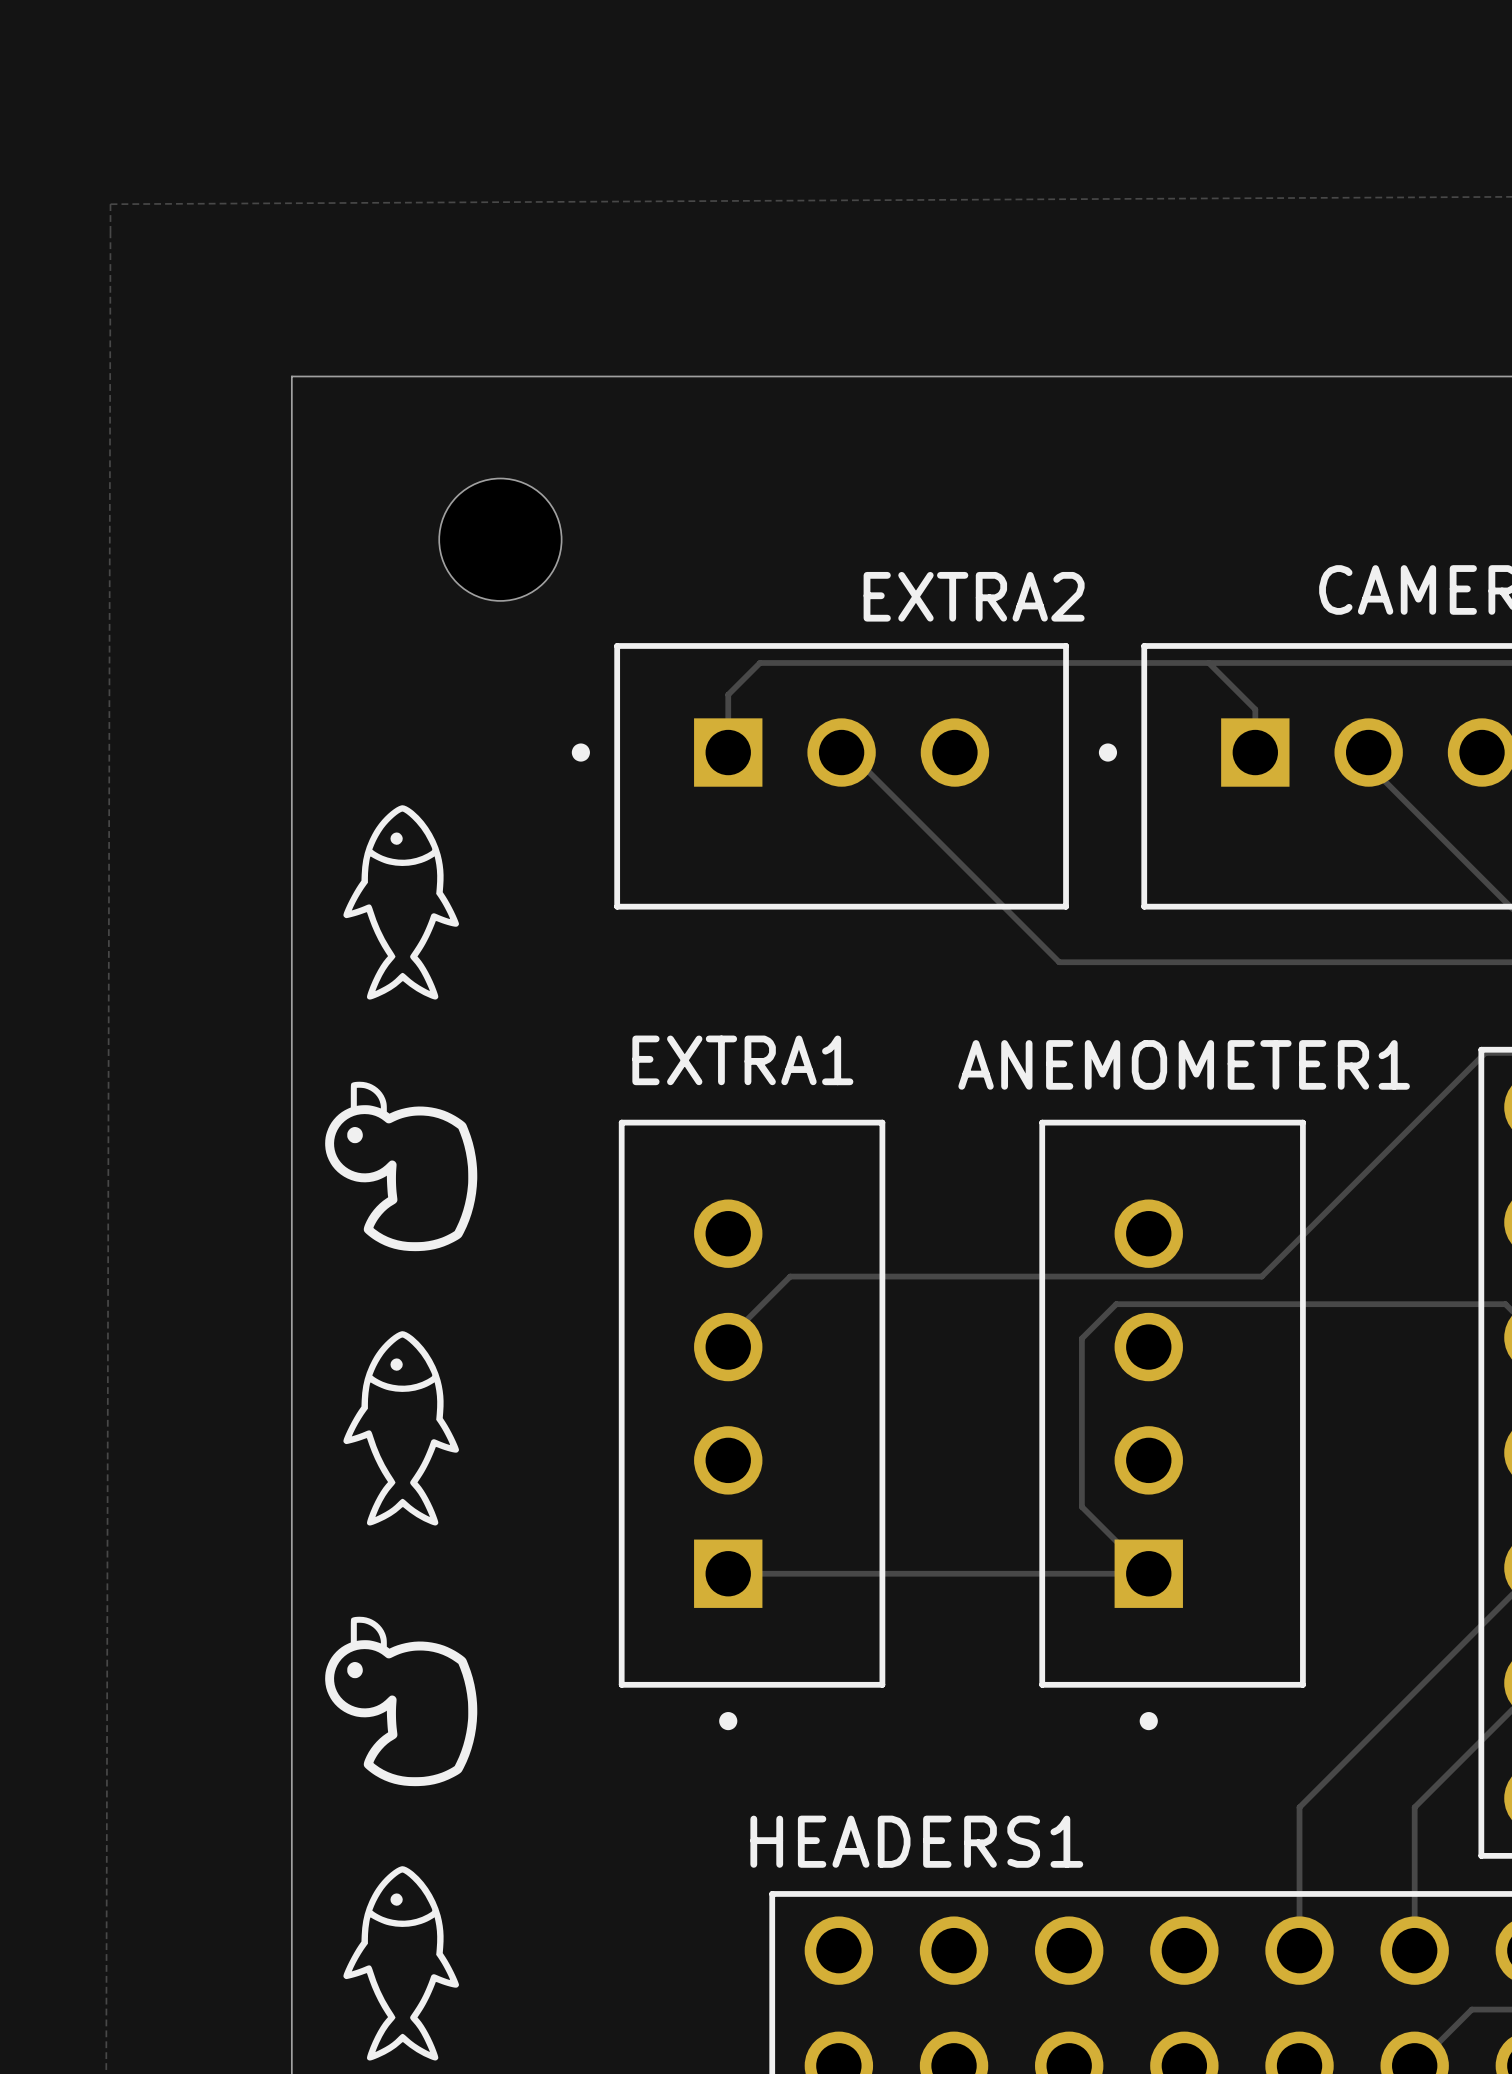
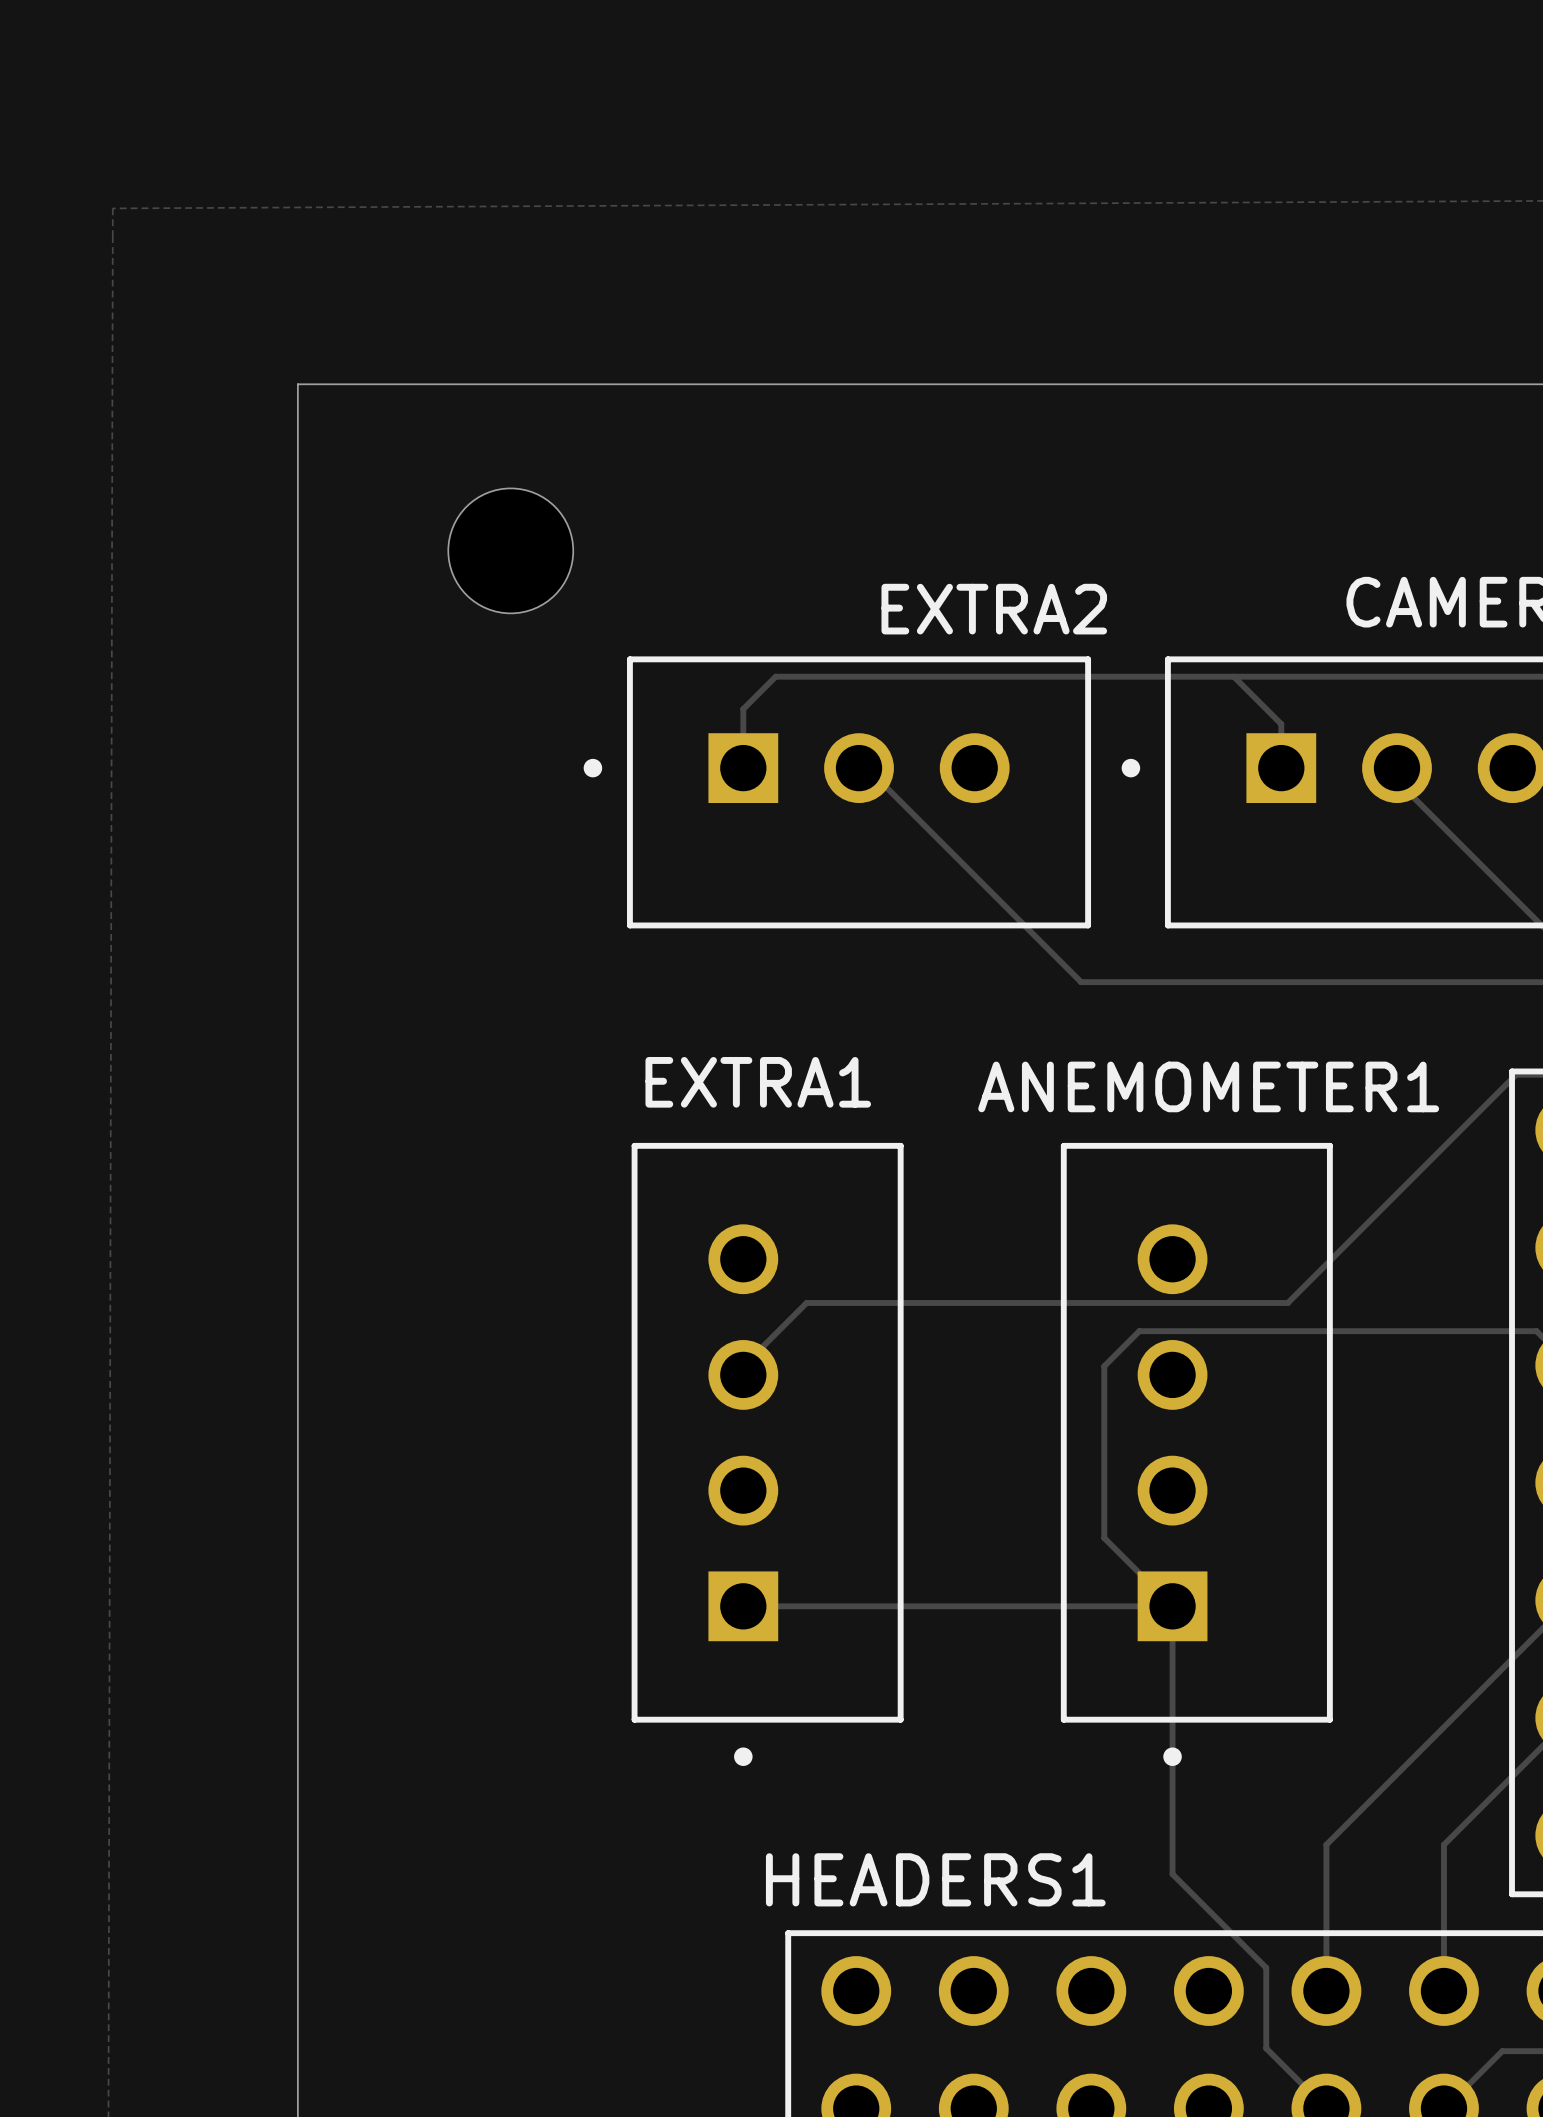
drawing: [343, 805, 459, 1000] -> none
drawing: [325, 1081, 478, 1252] -> none
drawing: [343, 1331, 459, 1526] -> none
track: none -> (1172, 1606) (1172, 1874) (1266, 1967) (1266, 2048) (1326, 2108)
drawing: [325, 1616, 478, 1787] -> none
drawing: [343, 1866, 459, 2061] -> none

